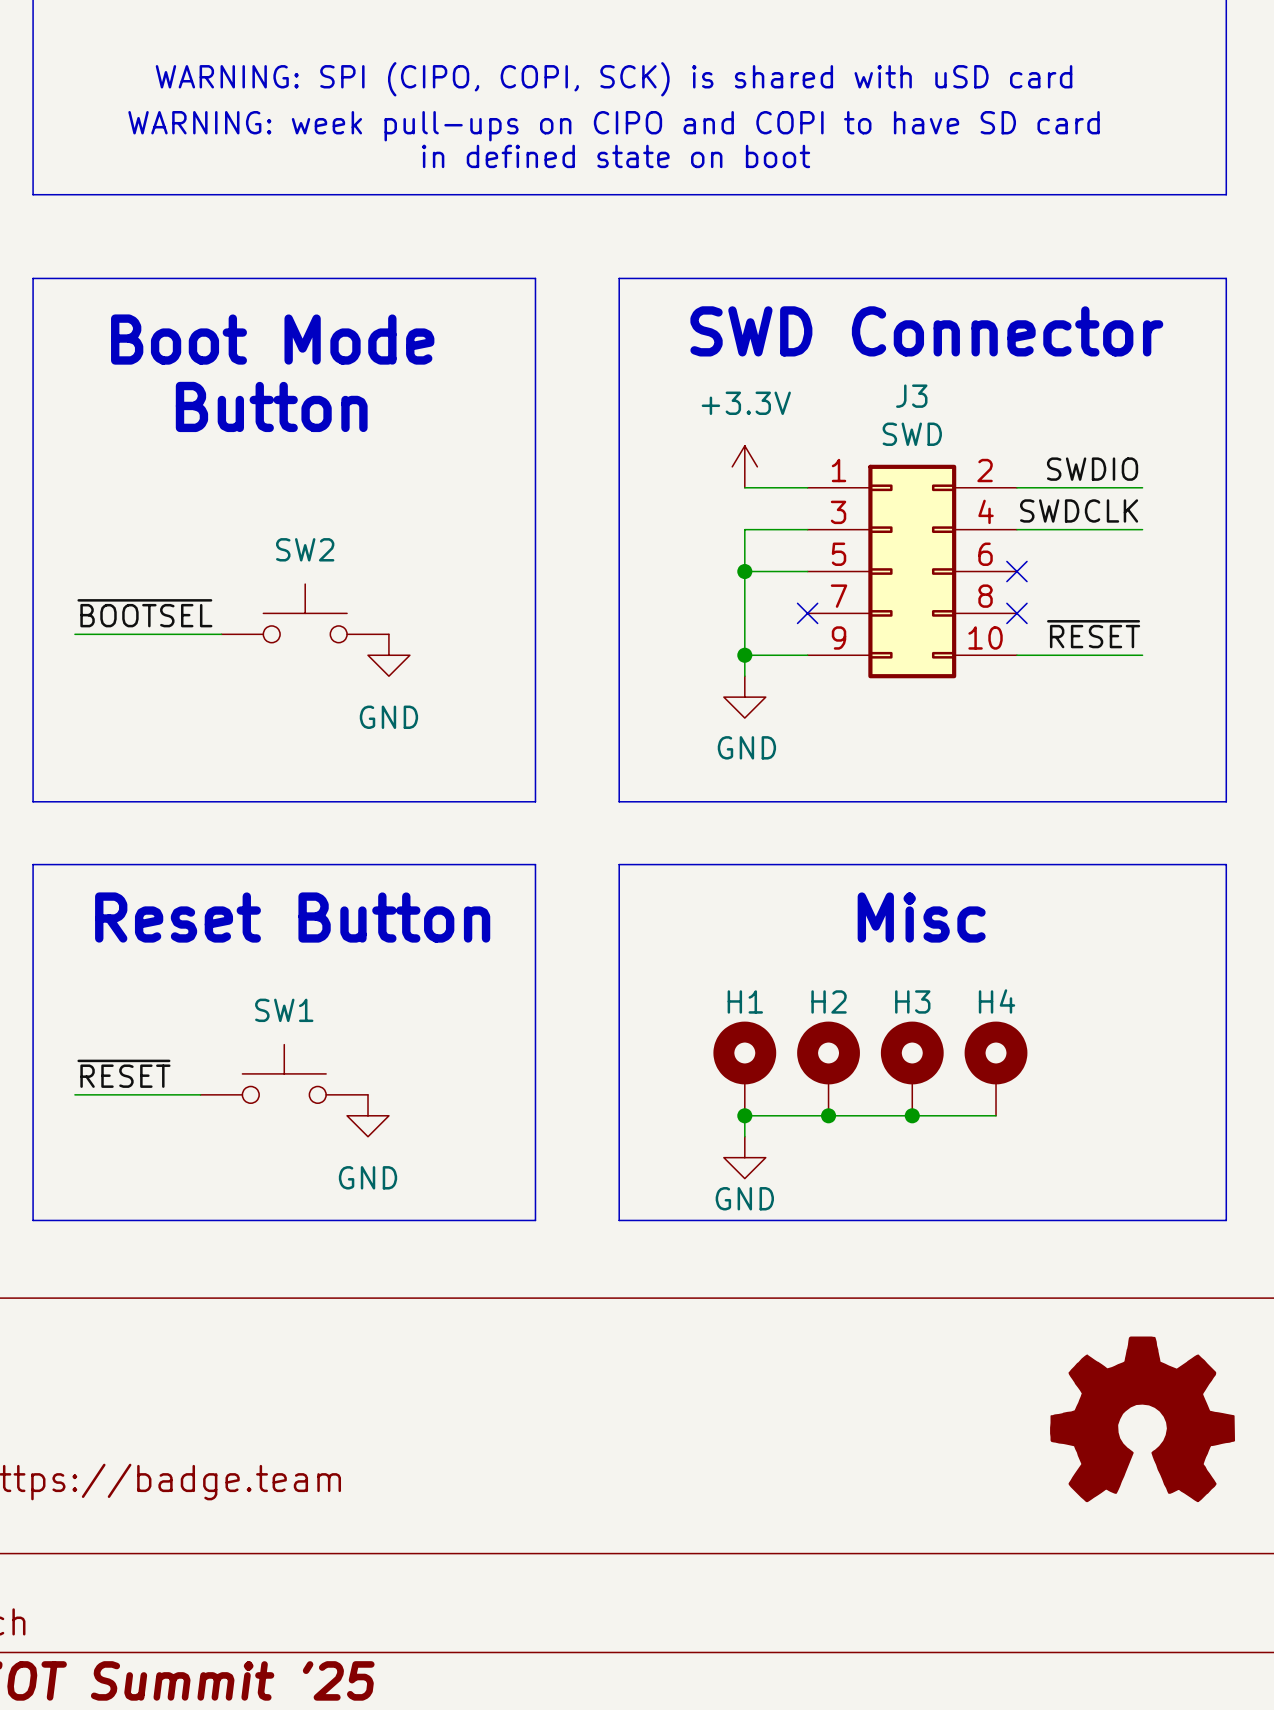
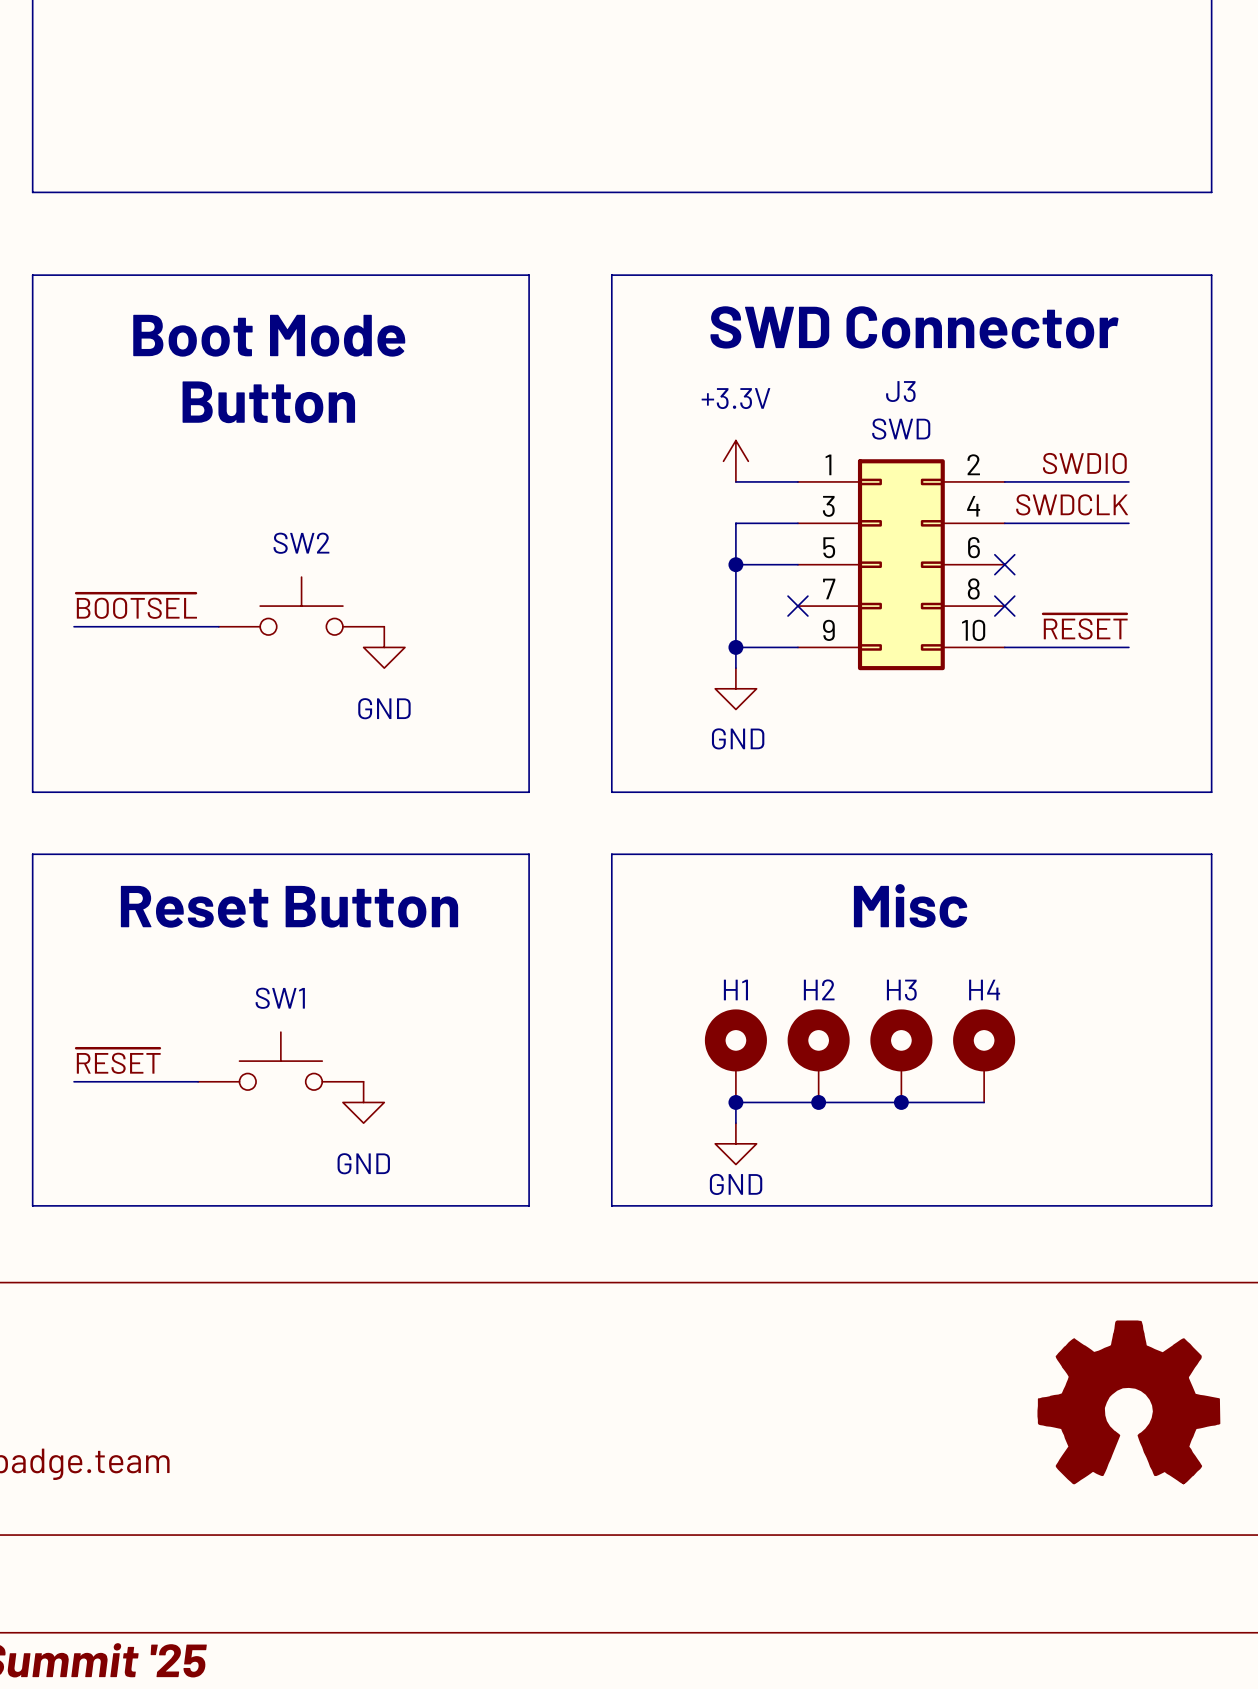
text: WARNING: SPI (CIPO, COPI, SCK) is shared with uSD card (614, 79) -> none
text: WARNING: week pull-ups on CIPO and COPI to have SD card (614, 126) -> none
text: in defined state on boot (616, 156) -> none

